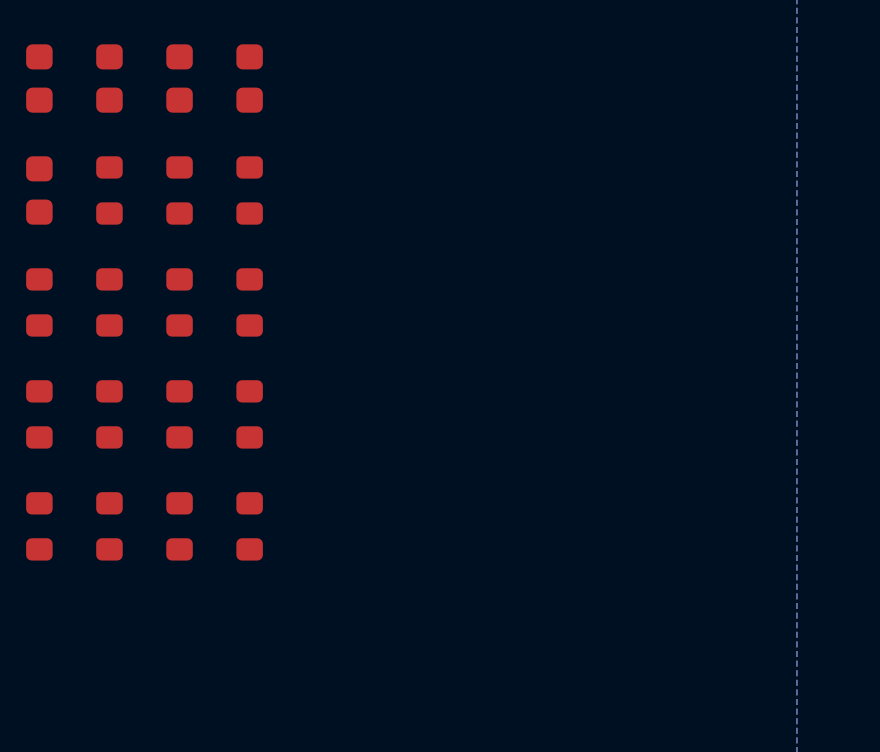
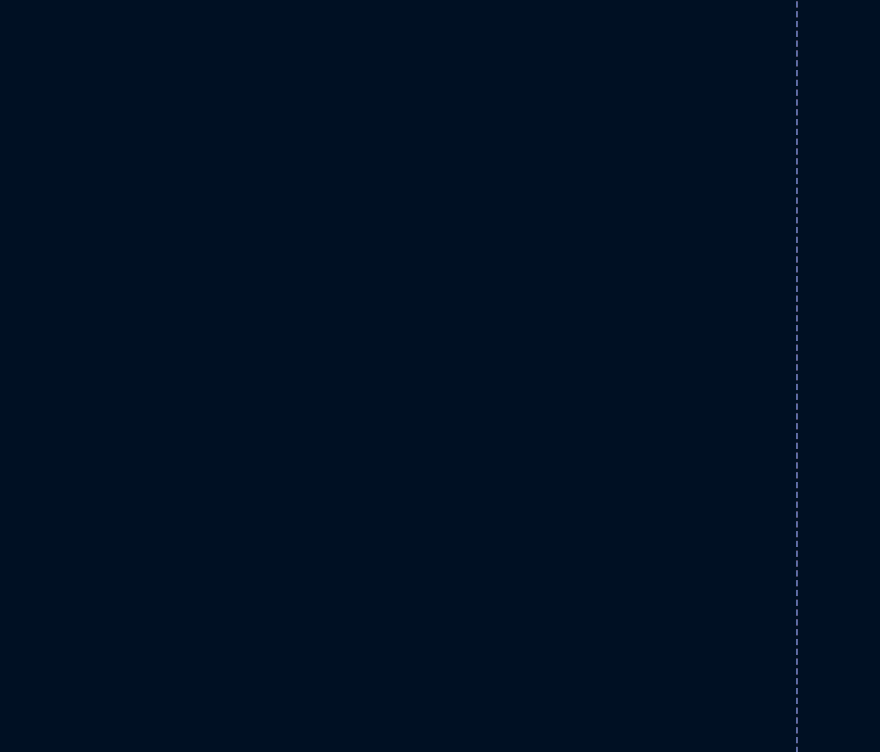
part: (39, 78) -> none
part: (109, 78) -> none
part: (179, 78) -> none
part: (249, 78) -> none
part: (39, 190) -> none
part: (109, 190) -> none
part: (179, 190) -> none
part: (249, 190) -> none
part: (39, 302) -> none
part: (109, 302) -> none
part: (179, 302) -> none
part: (249, 302) -> none
part: (39, 414) -> none
part: (109, 414) -> none
part: (179, 414) -> none
part: (249, 414) -> none
part: (39, 526) -> none
part: (109, 526) -> none
part: (179, 526) -> none
part: (249, 526) -> none

